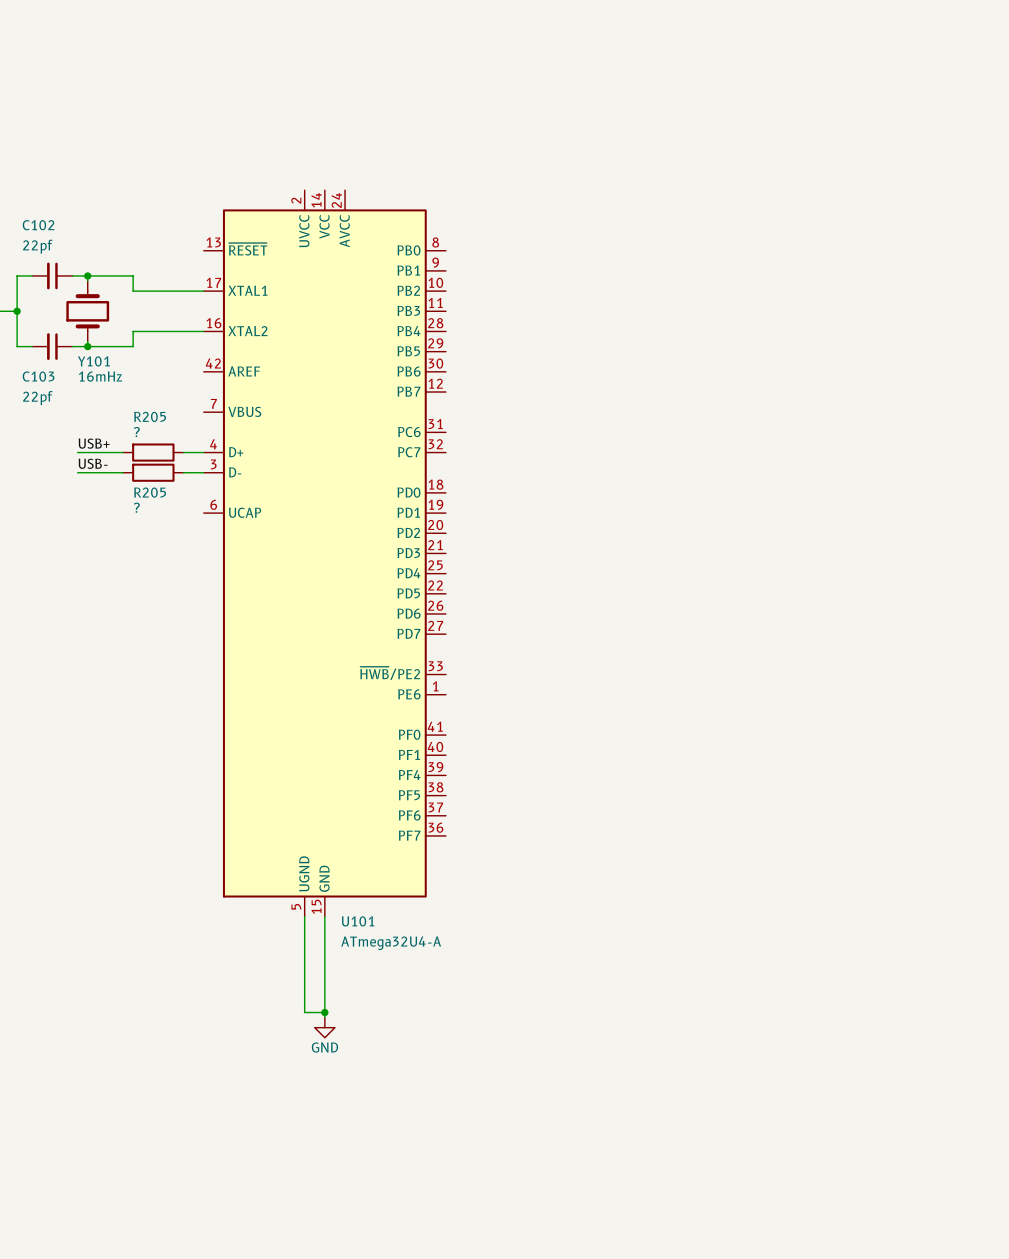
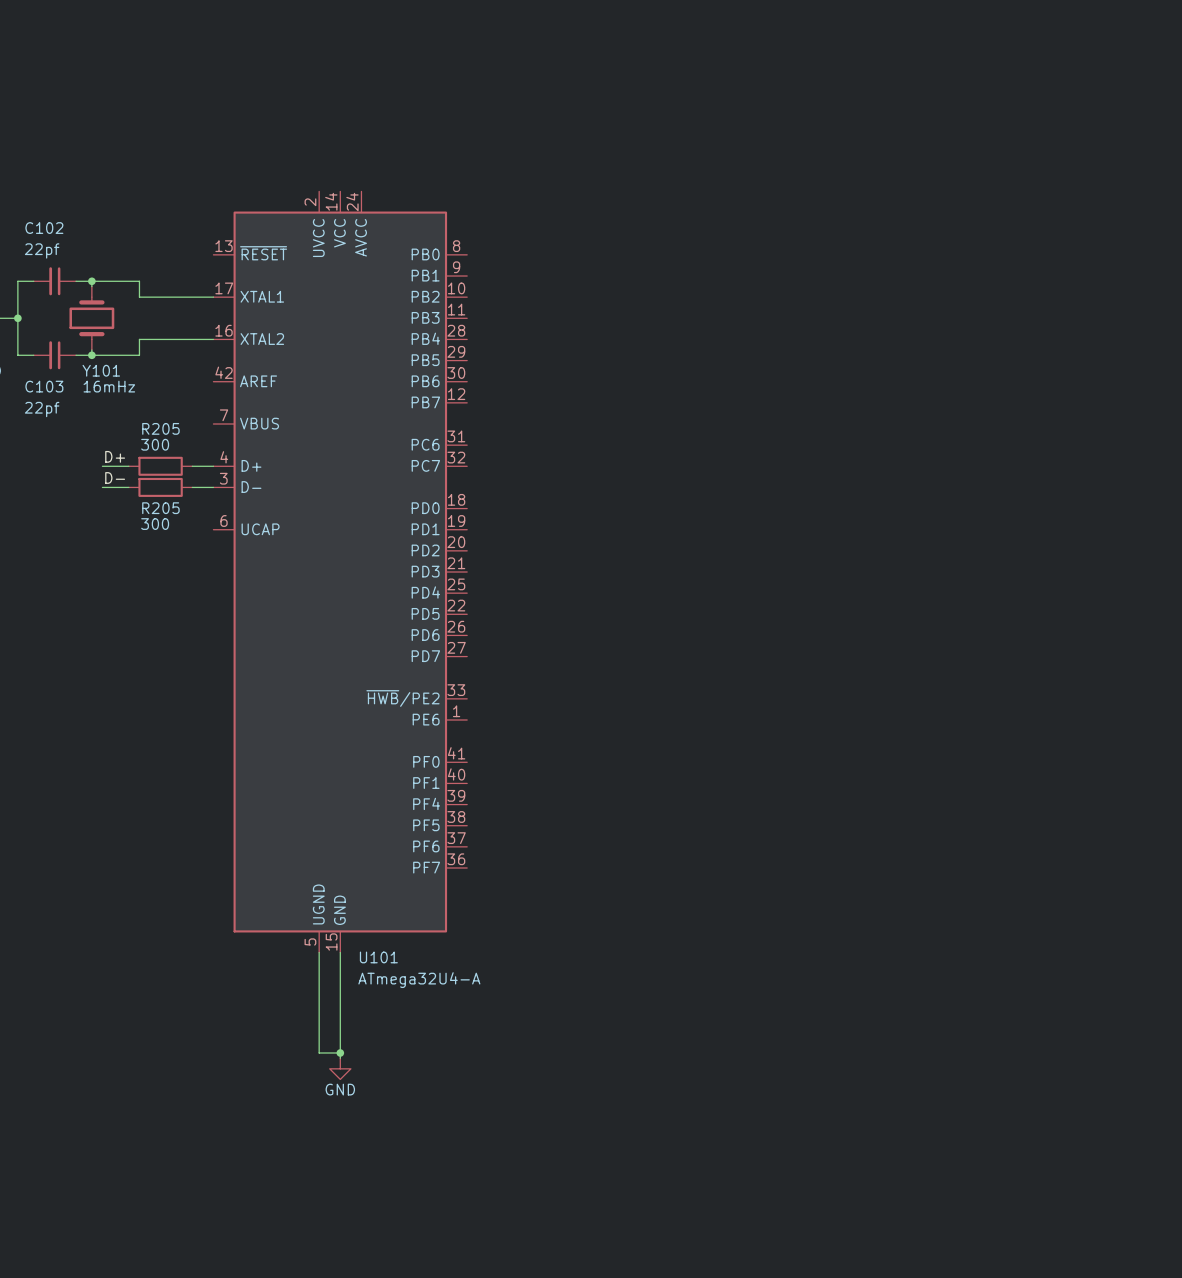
R205 value: ? (136, 432) -> 300 (155, 444)
label: USB+ (94, 443) -> none
label: none -> D+ (115, 456)
wire: (77, 452) (97, 452) -> none
label: USB- (93, 463) -> none
label: none -> D- (115, 477)
wire: (77, 472) (97, 472) -> none
R205 value: ? (136, 507) -> 300 (155, 524)

